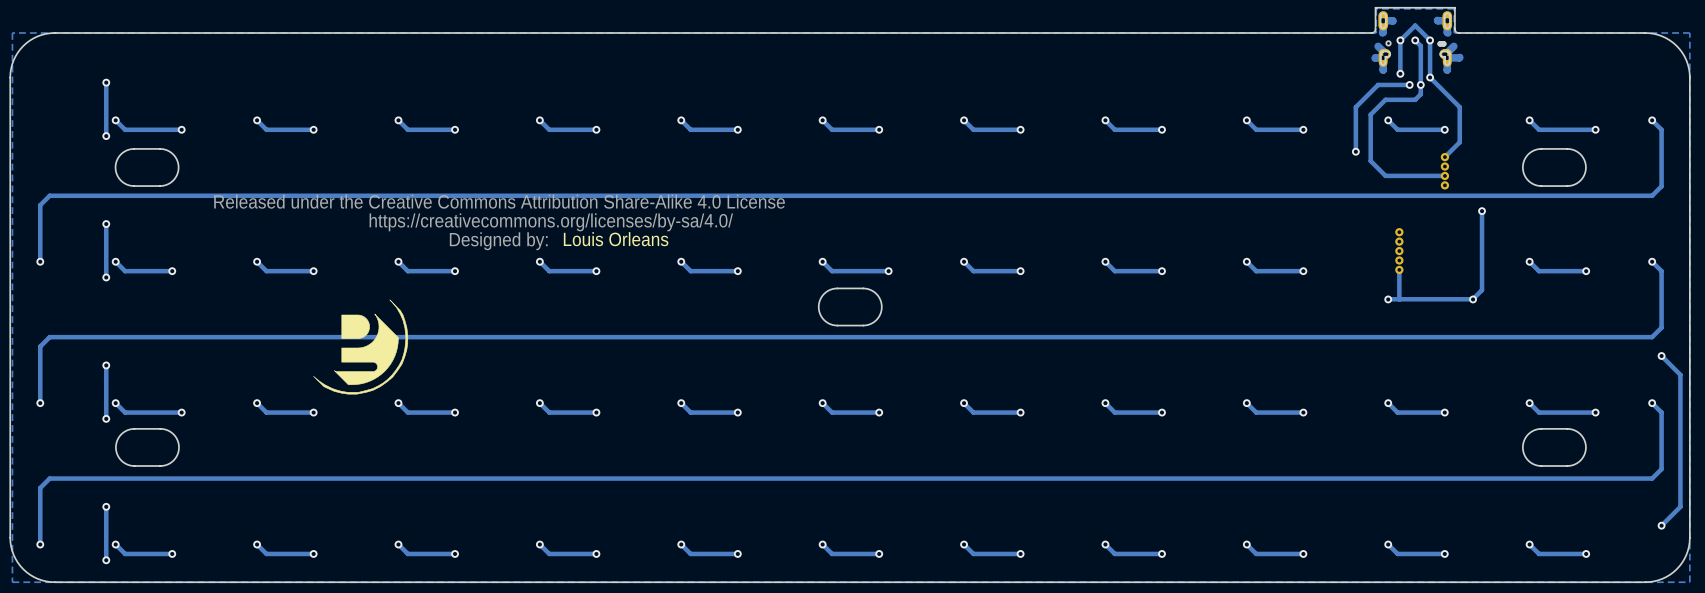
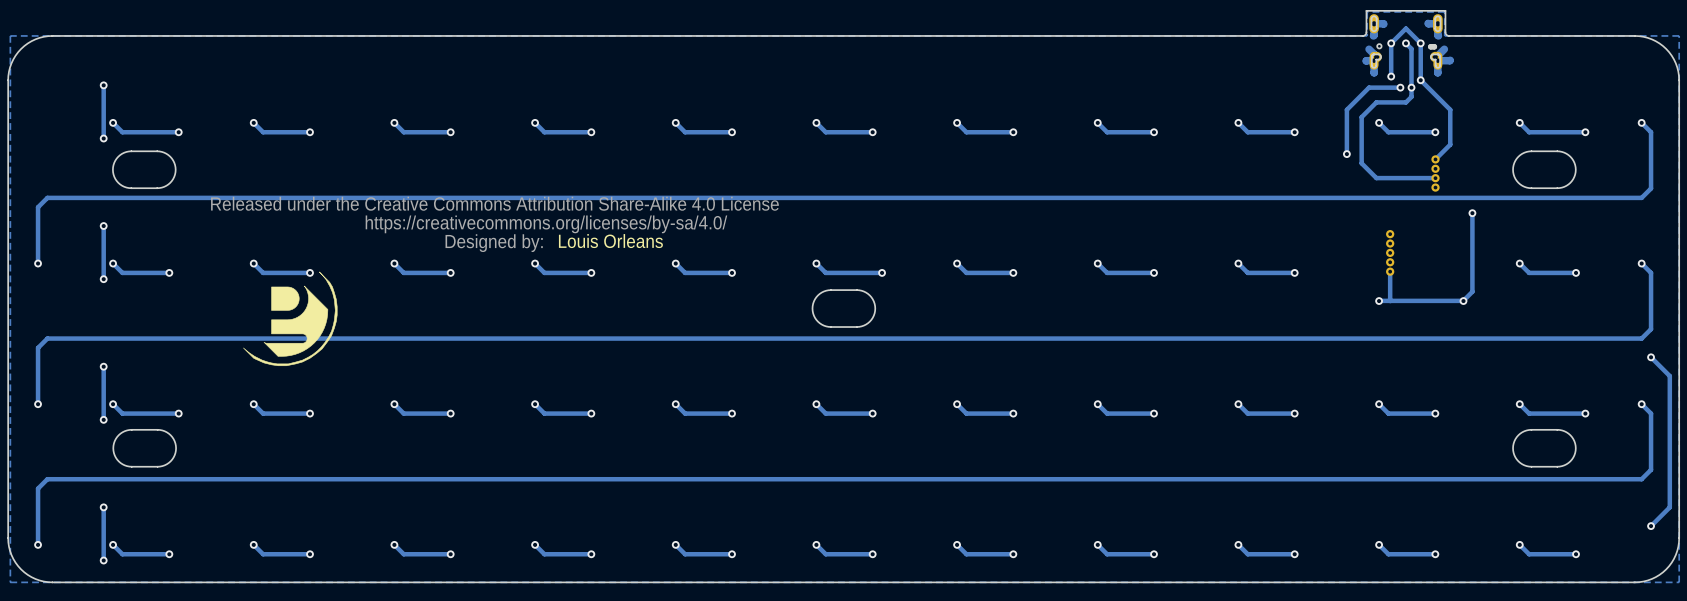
drawing position: (355, 326) -> (285, 298)
drawing position: (360, 347) -> (290, 318)
drawing position: (366, 349) -> (295, 321)

